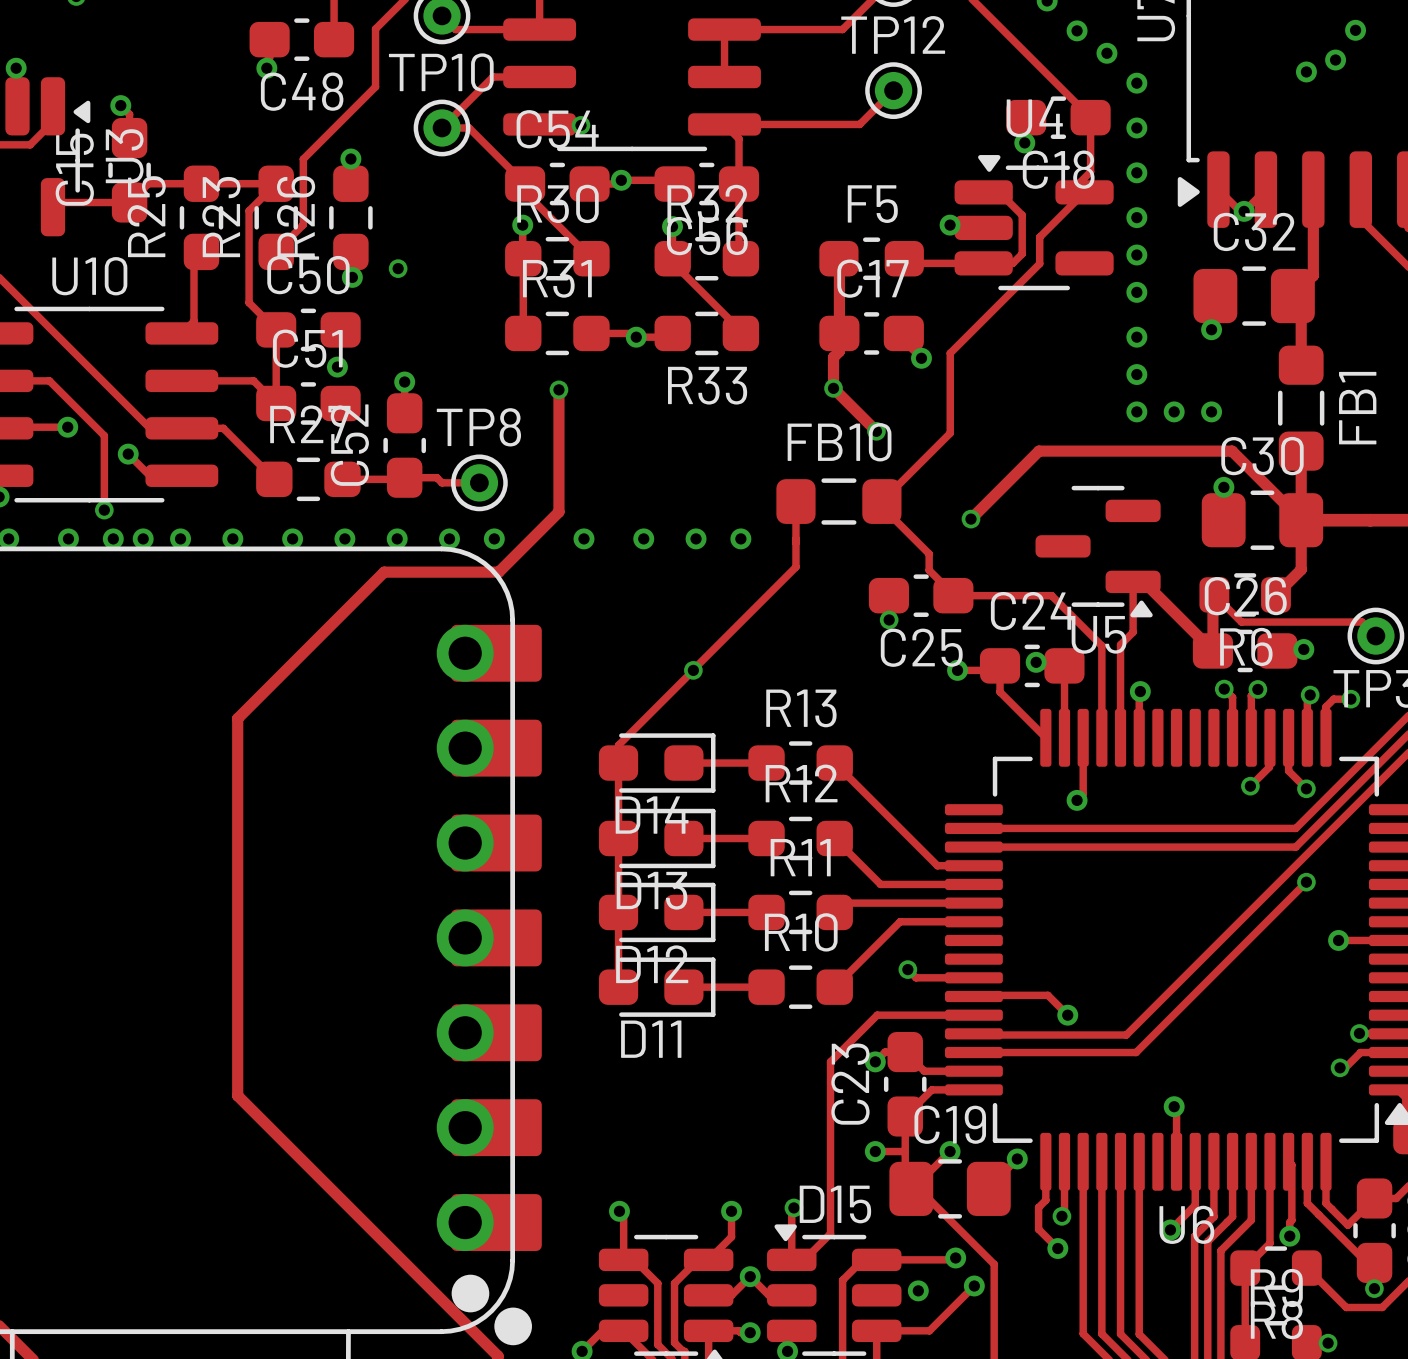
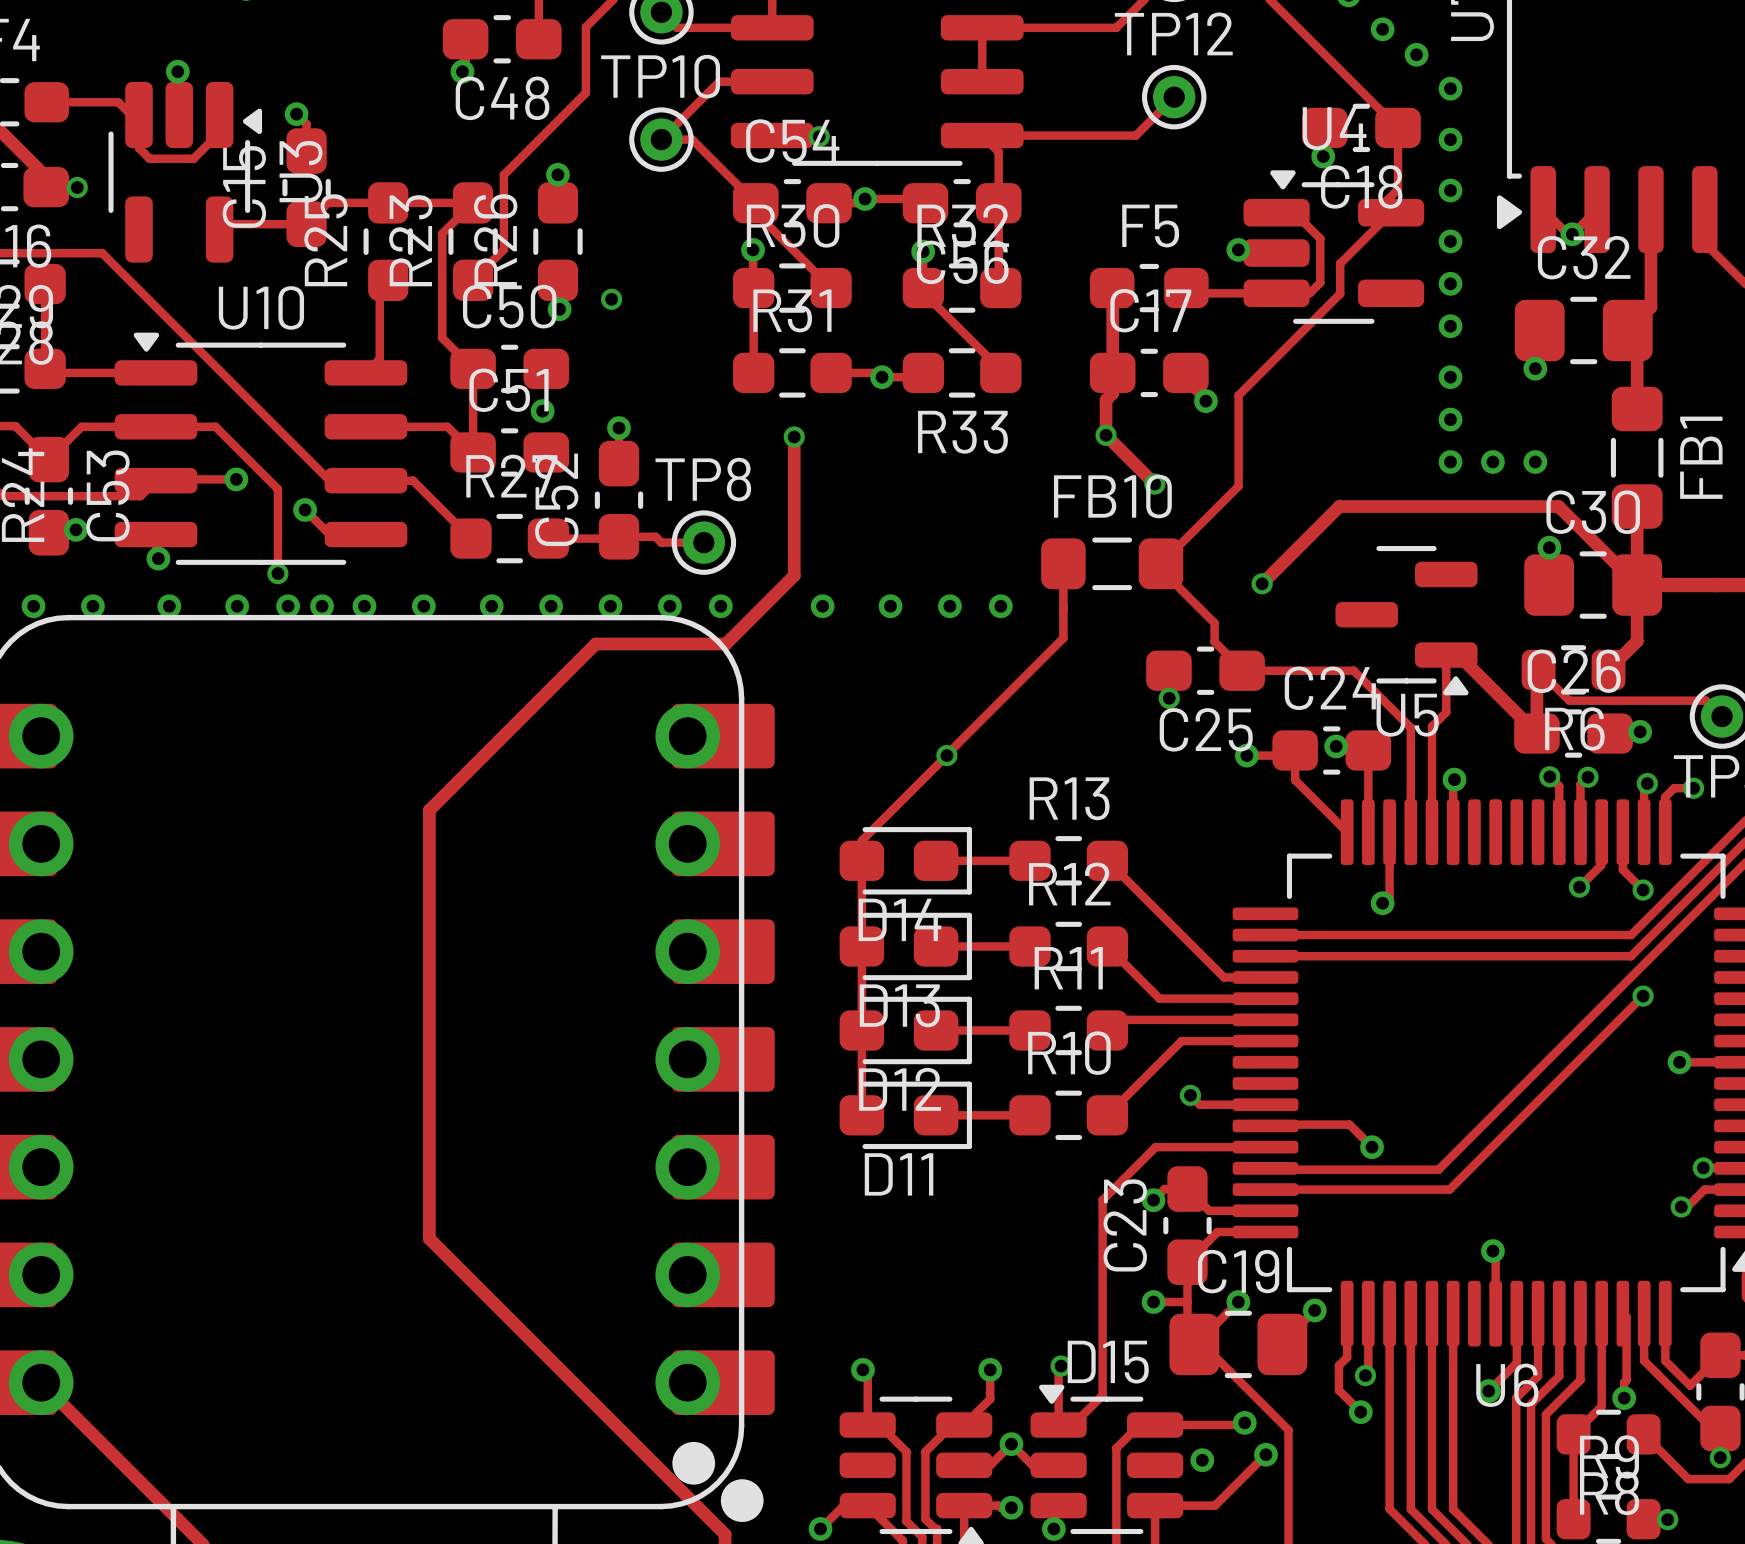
via: (1355, 30) -> none
via: (1335, 60) -> none
via: (1306, 71) -> none

